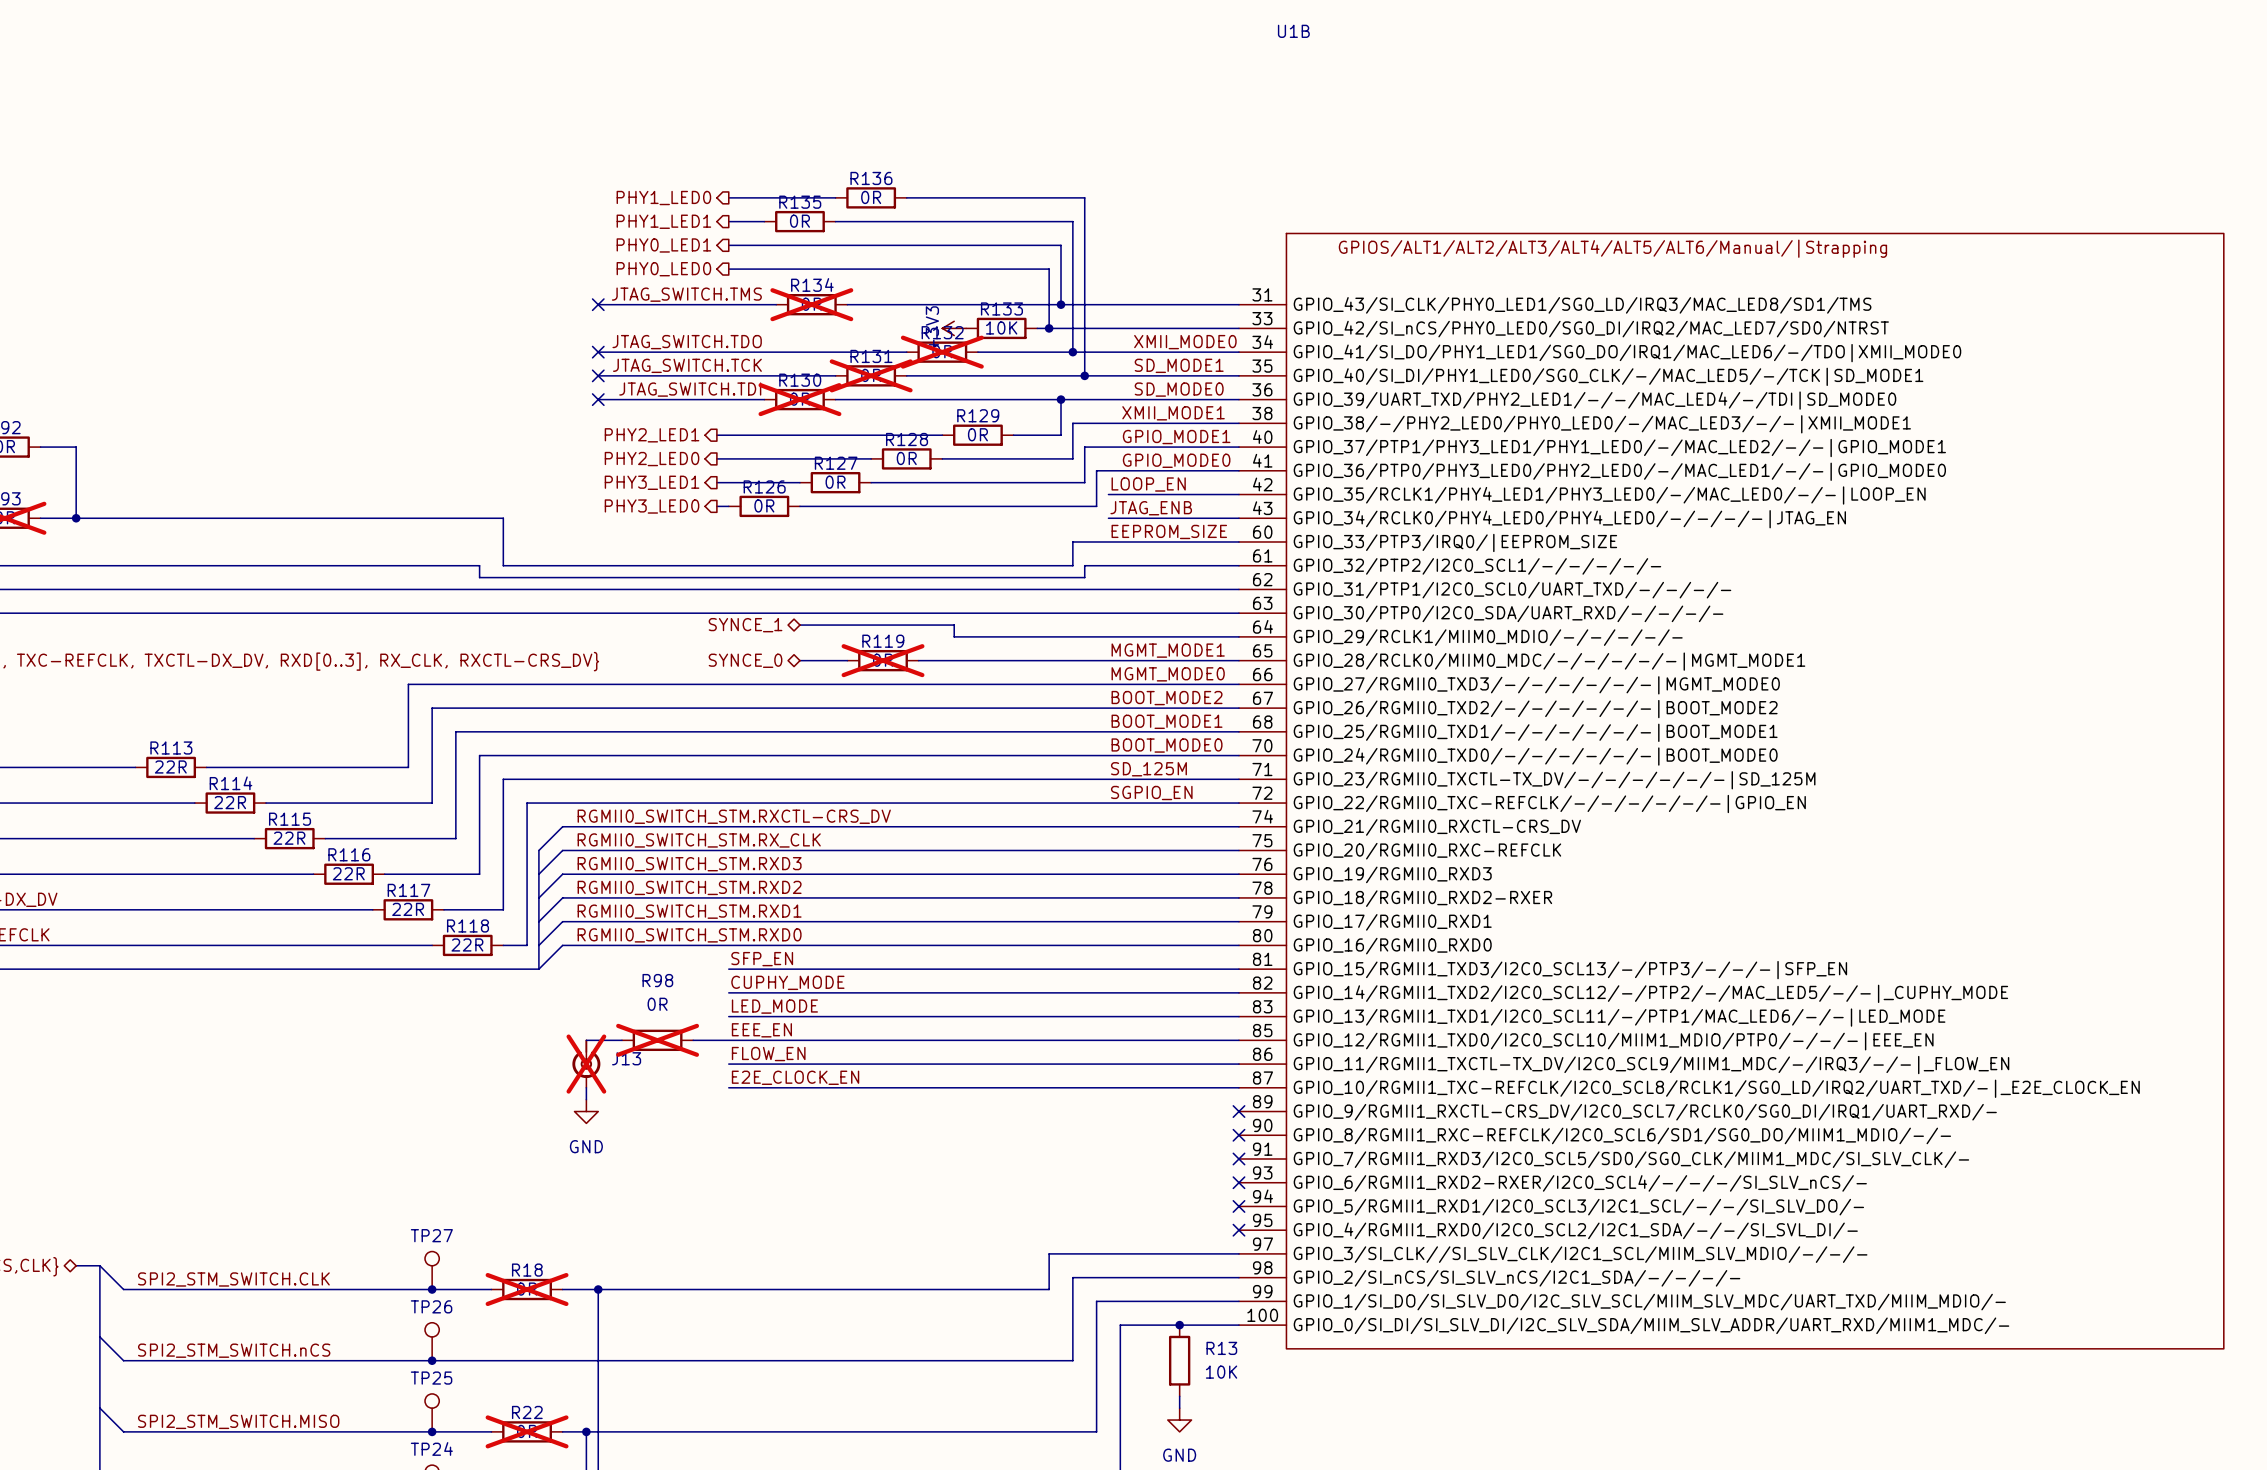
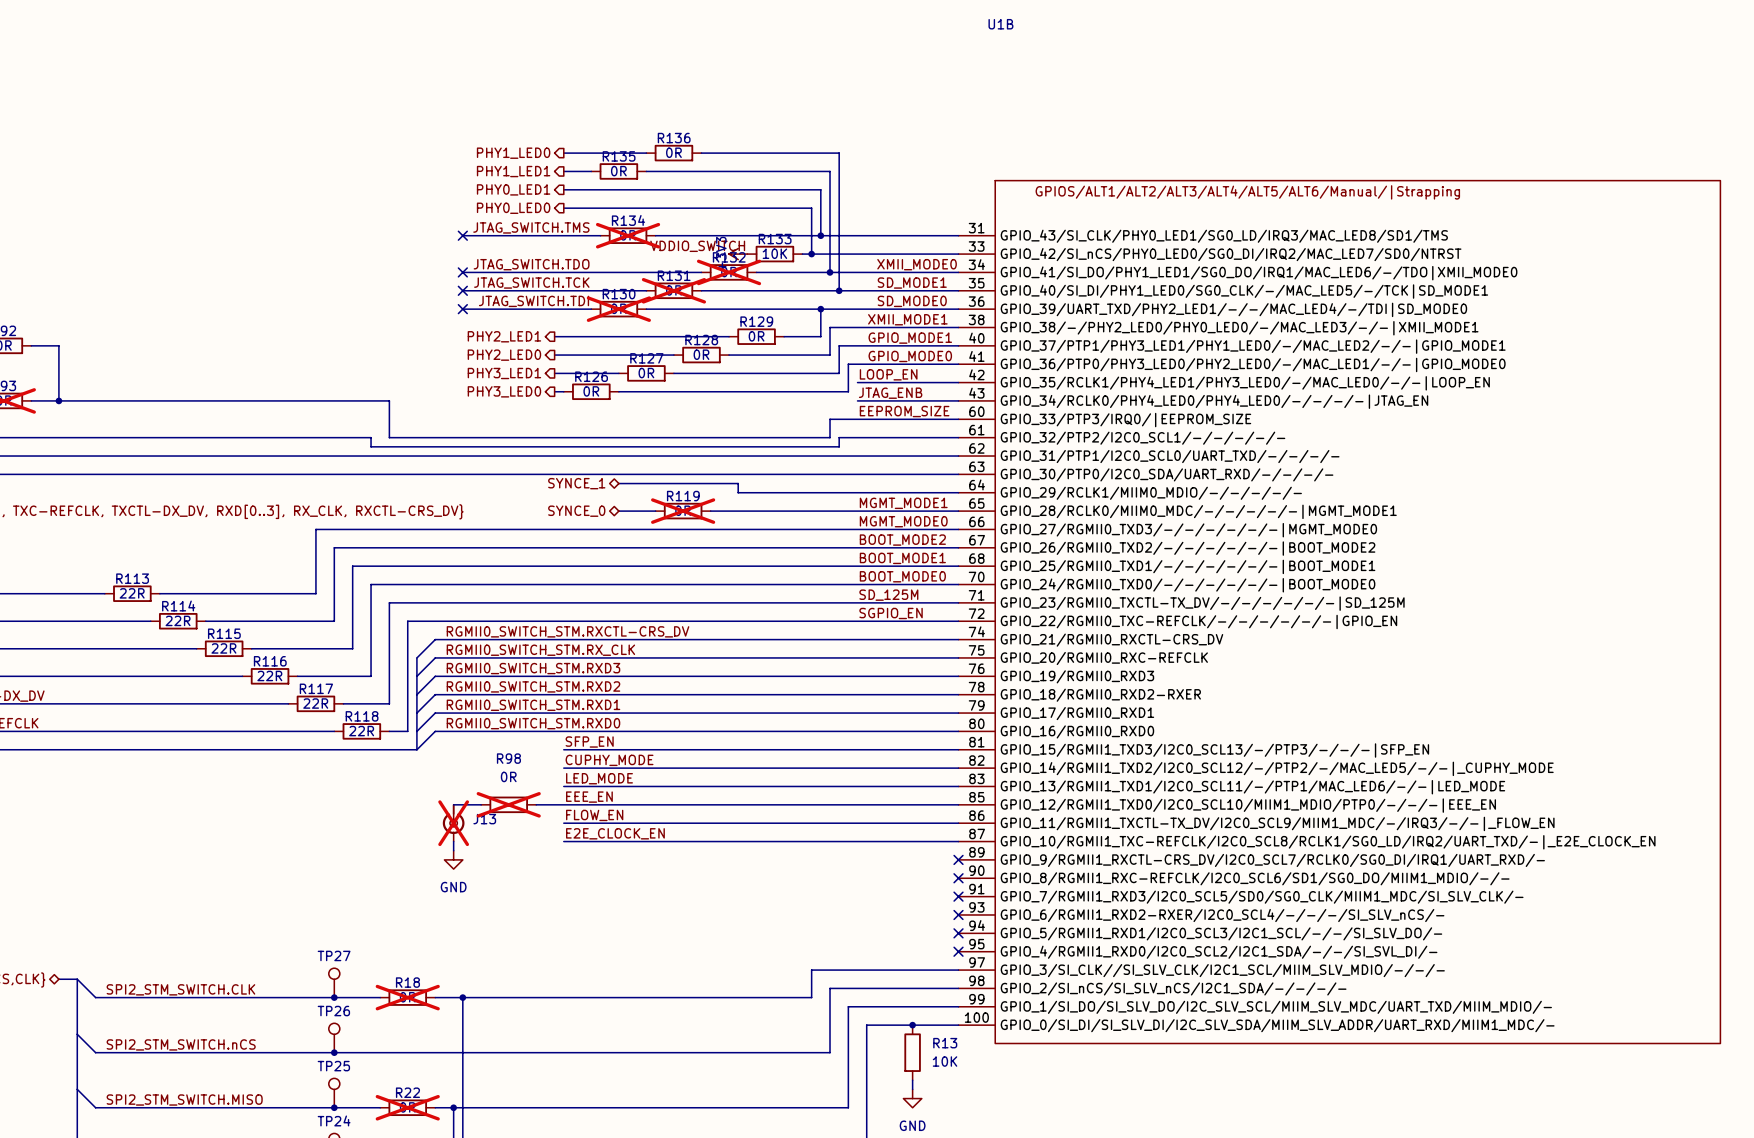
label: none -> VDDIO_SWITCH (697, 246)

